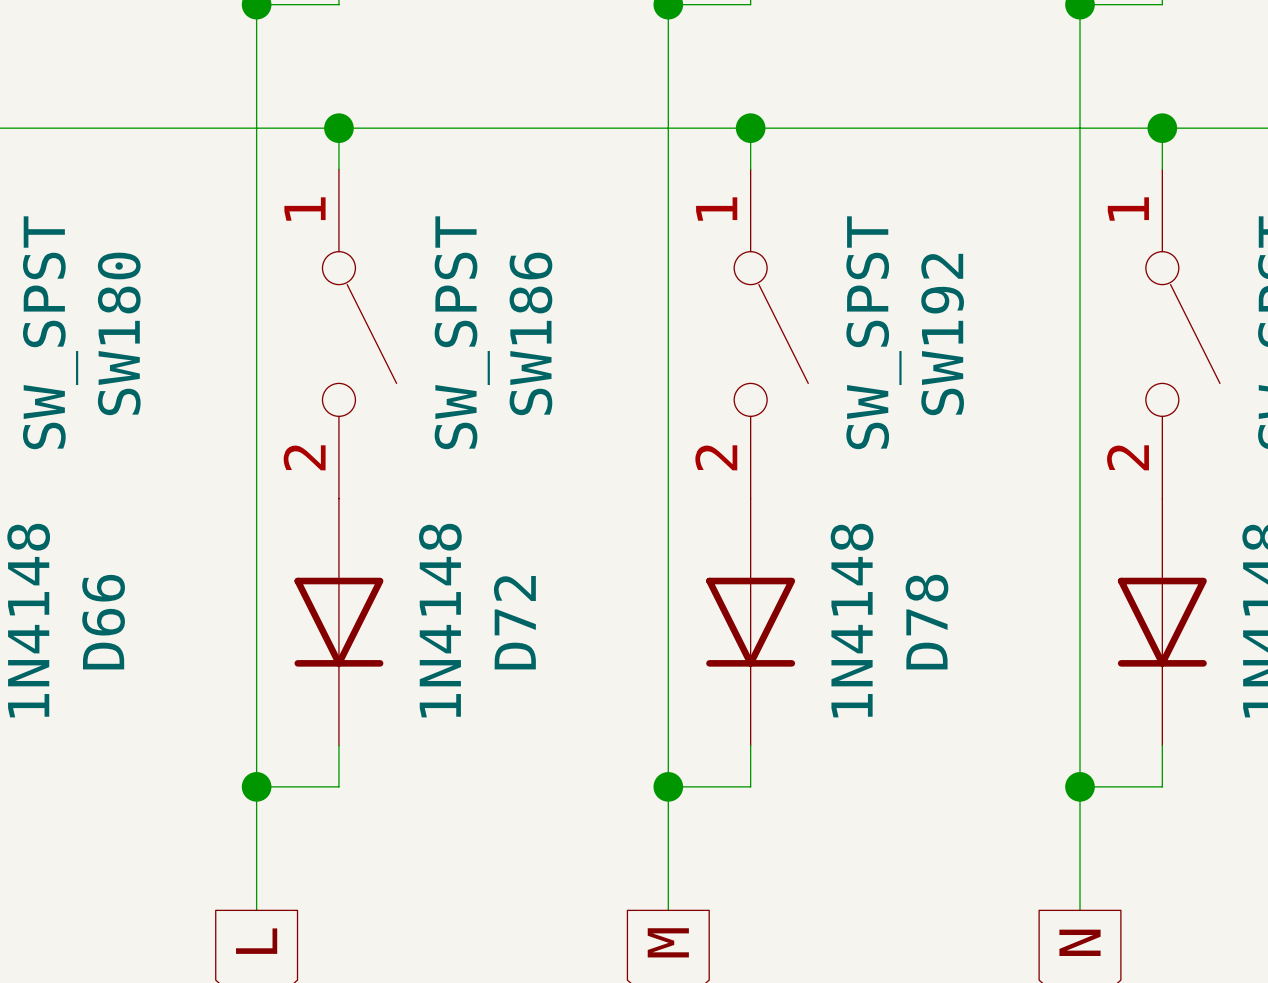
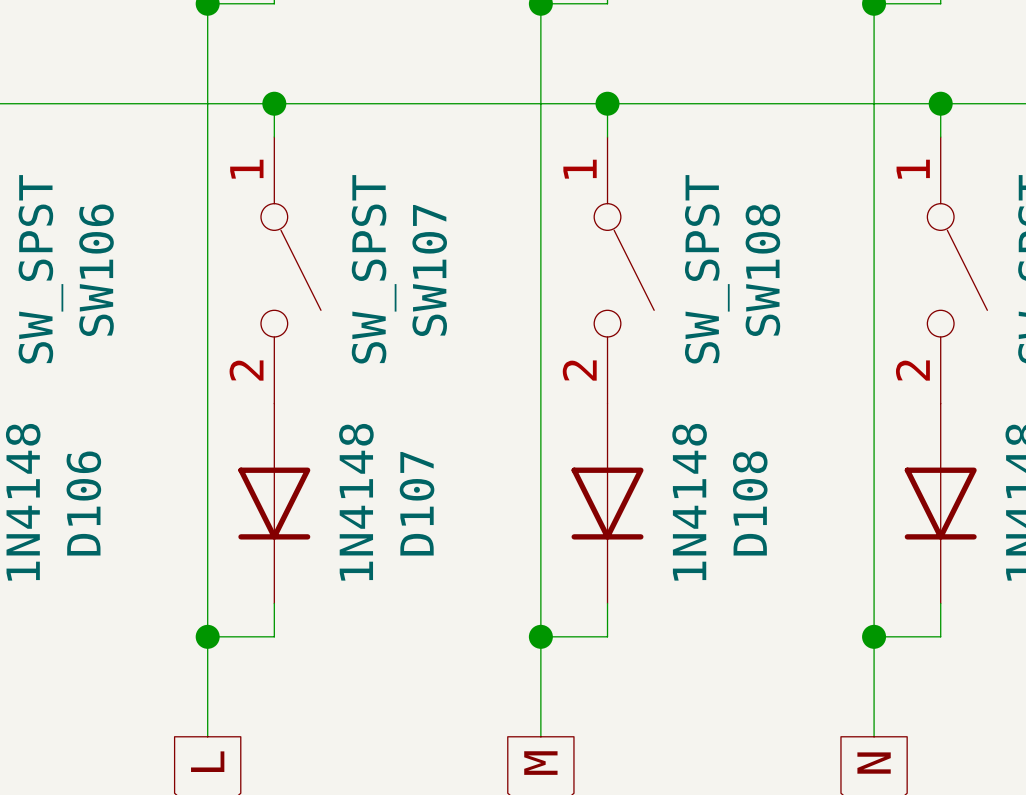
SW180 name: SW180 (119, 333) -> SW106 (96, 270)
SW186 name: SW186 (530, 333) -> SW107 (429, 270)
SW192 name: SW192 (942, 334) -> SW108 (762, 270)
D66 name: D66 (103, 622) -> D106 (83, 503)
D72 name: D72 (514, 622) -> D107 (417, 503)
D78 name: D78 (926, 622) -> D108 (750, 503)

